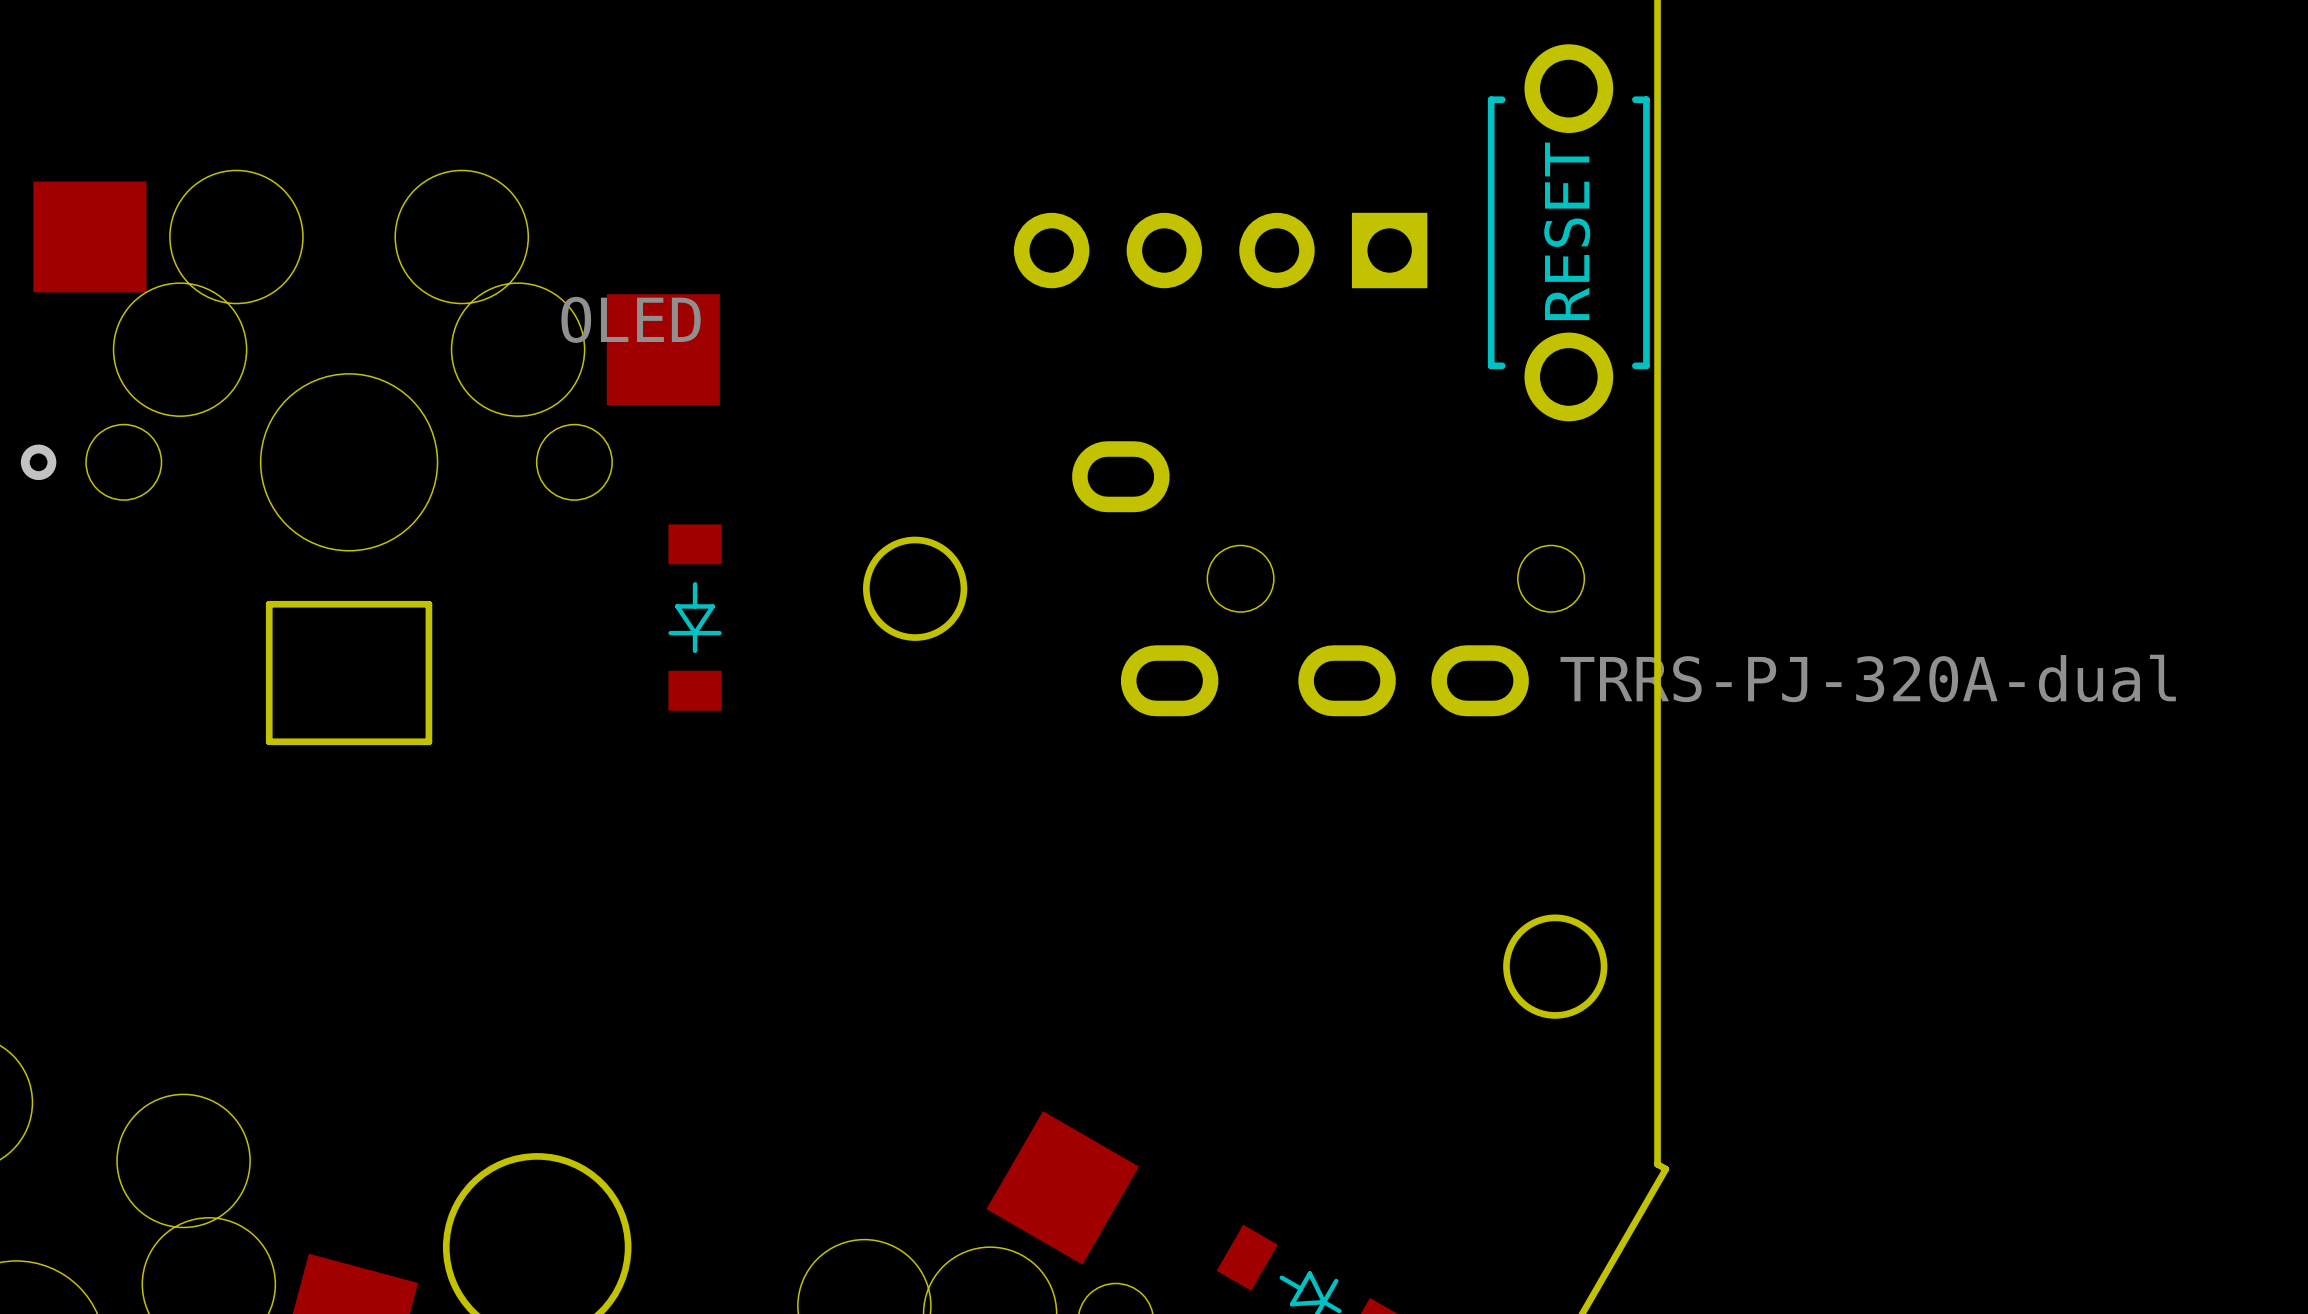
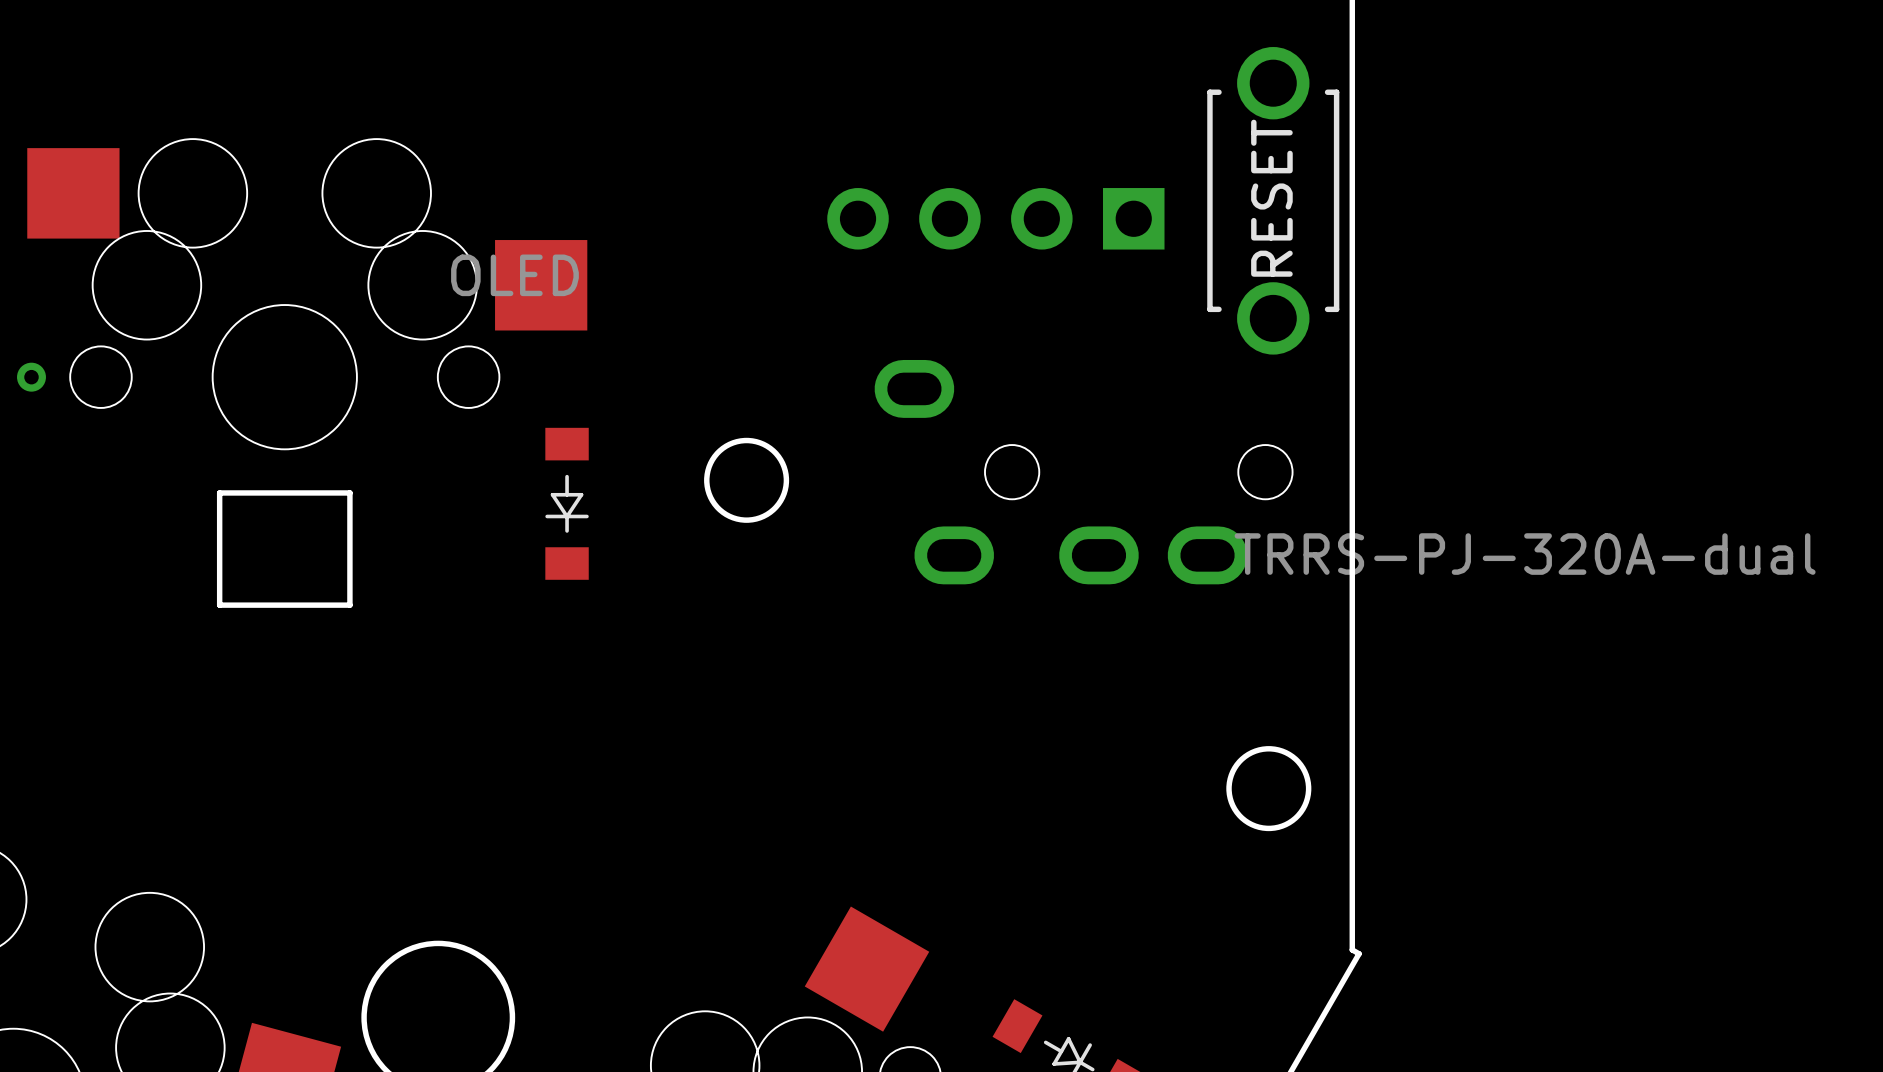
part position: (1568, 232) -> (1273, 200)
part position: (1220, 250) -> (995, 218)

